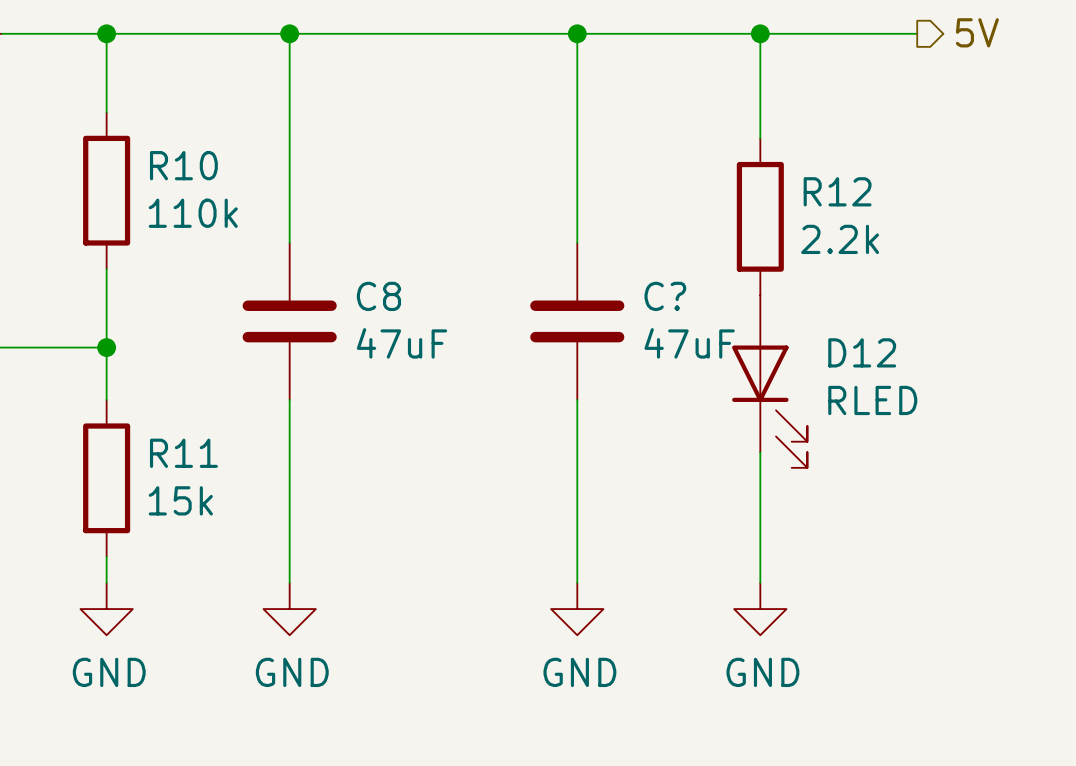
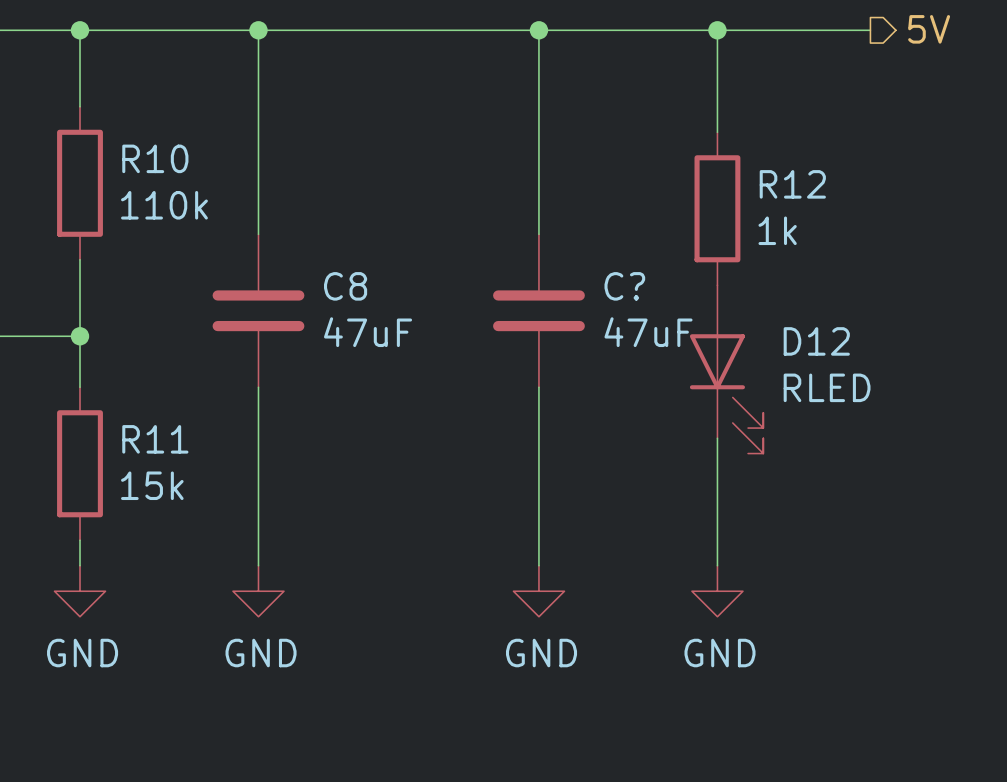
R12 value: 2.2k (840, 239) -> 1k (777, 230)

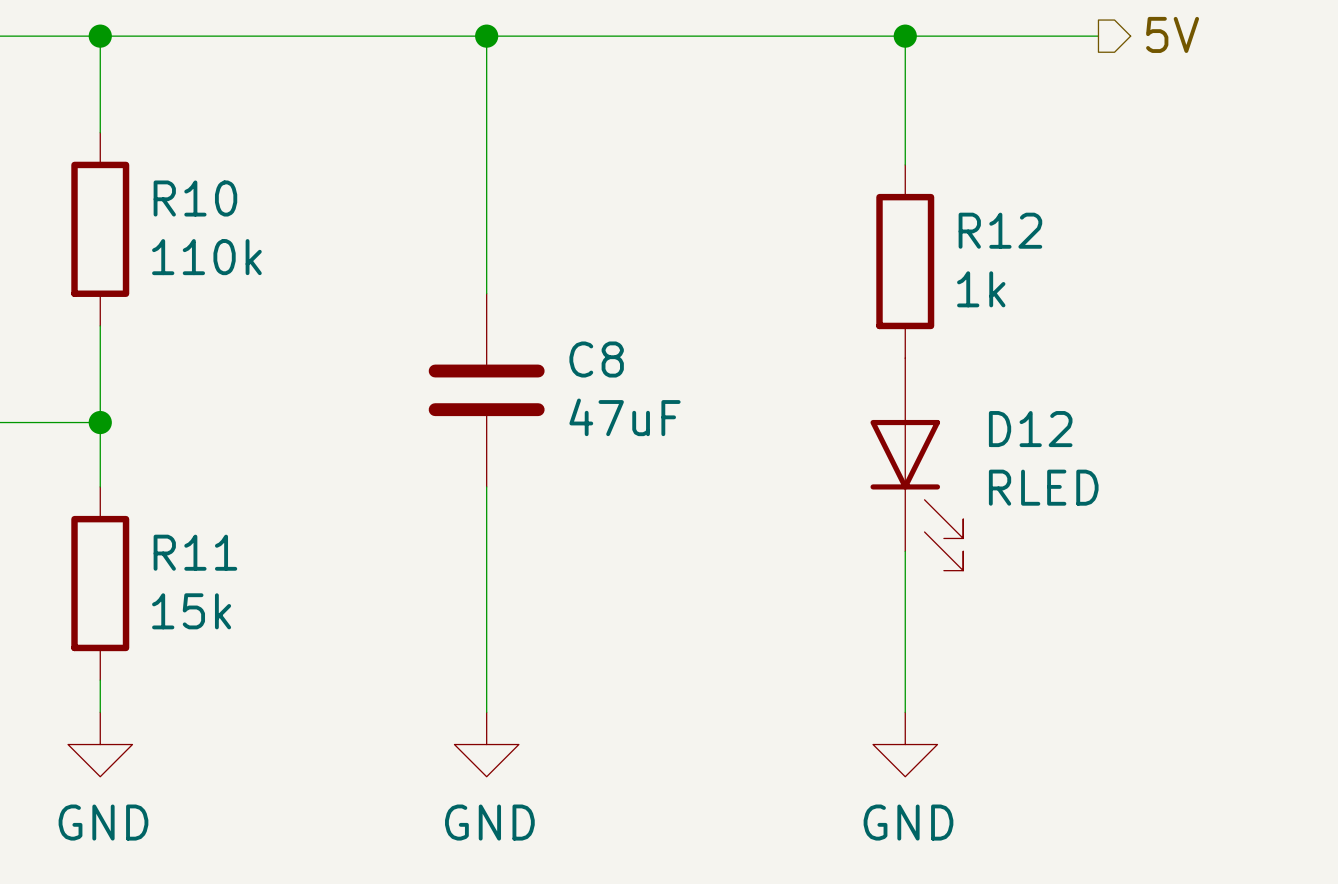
wire: (258, 30) (258, 234) -> (486, 36) (486, 293)
junction: (258, 30) -> none
junction: none -> (486, 36)
wire: (538, 30) (538, 234) -> none
junction: (538, 30) -> none
C8 position: (258, 310) -> (486, 390)
C?: 47uF (538, 310) -> none
wire: (258, 387) (258, 565) -> (486, 486) (486, 712)
wire: (538, 387) (538, 565) -> none
power symbol: GND (258, 591) -> none
power symbol: none -> GND (486, 744)
power symbol: GND (538, 591) -> none

